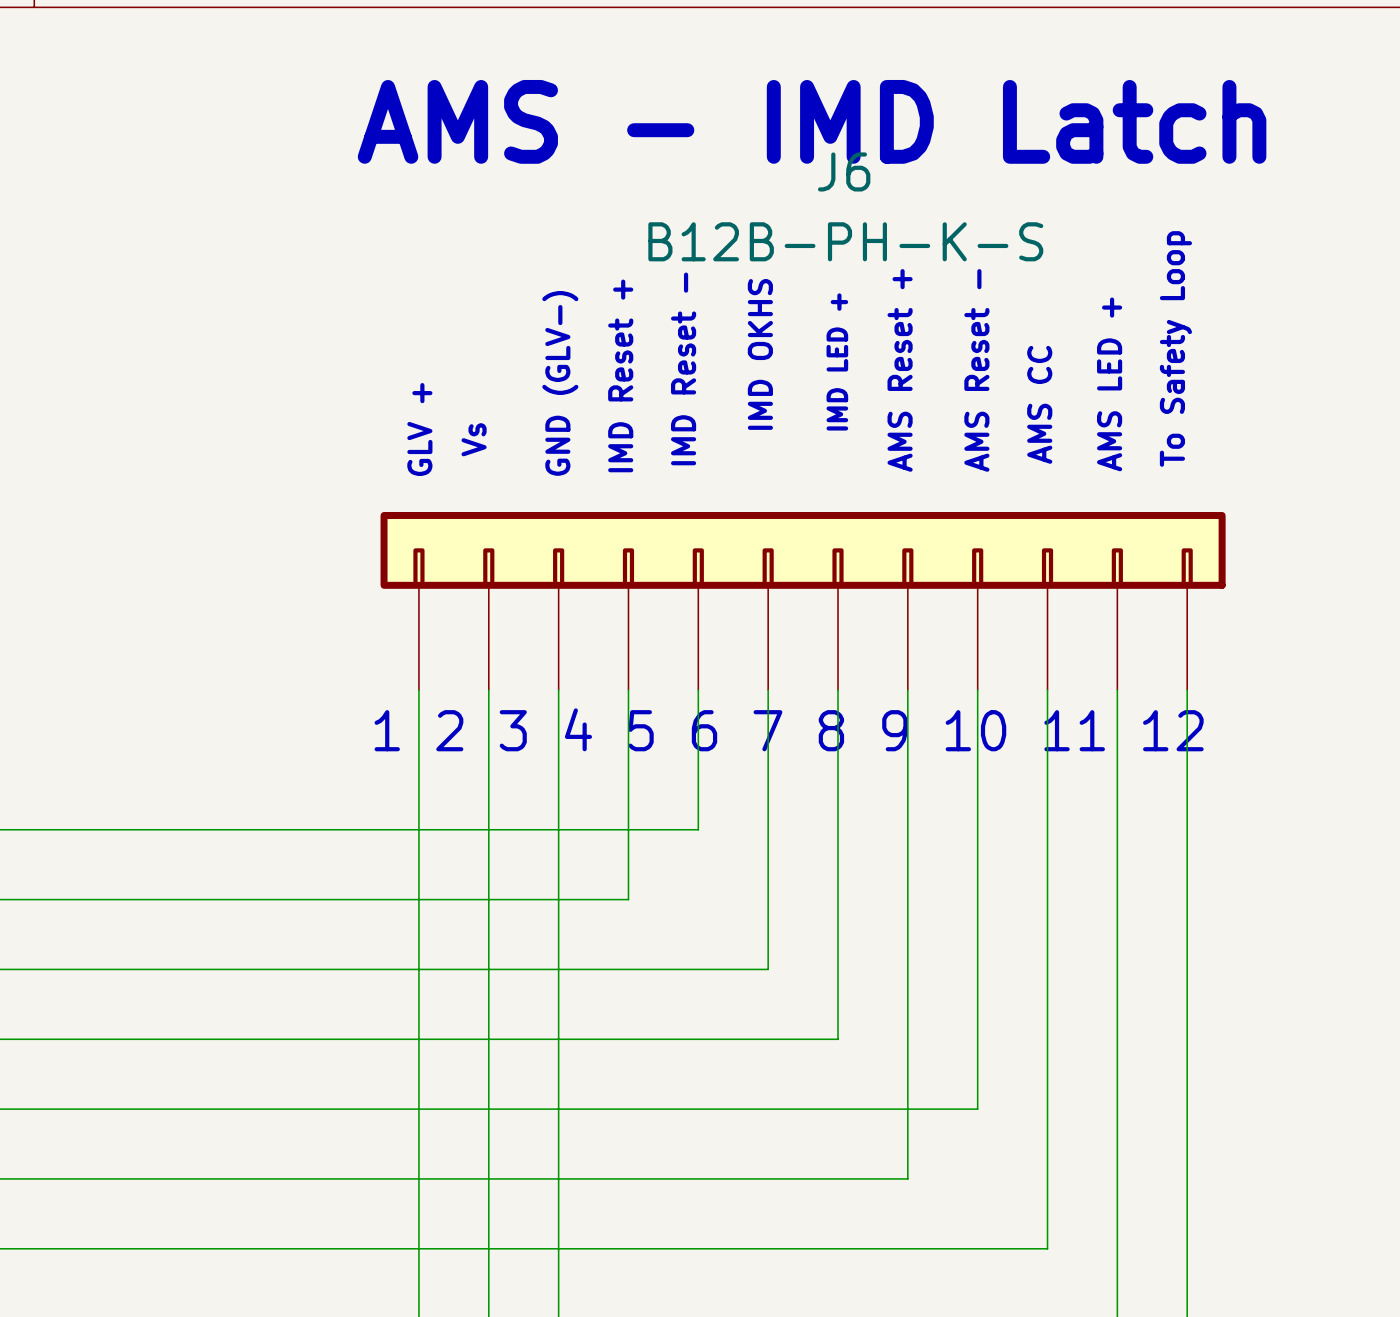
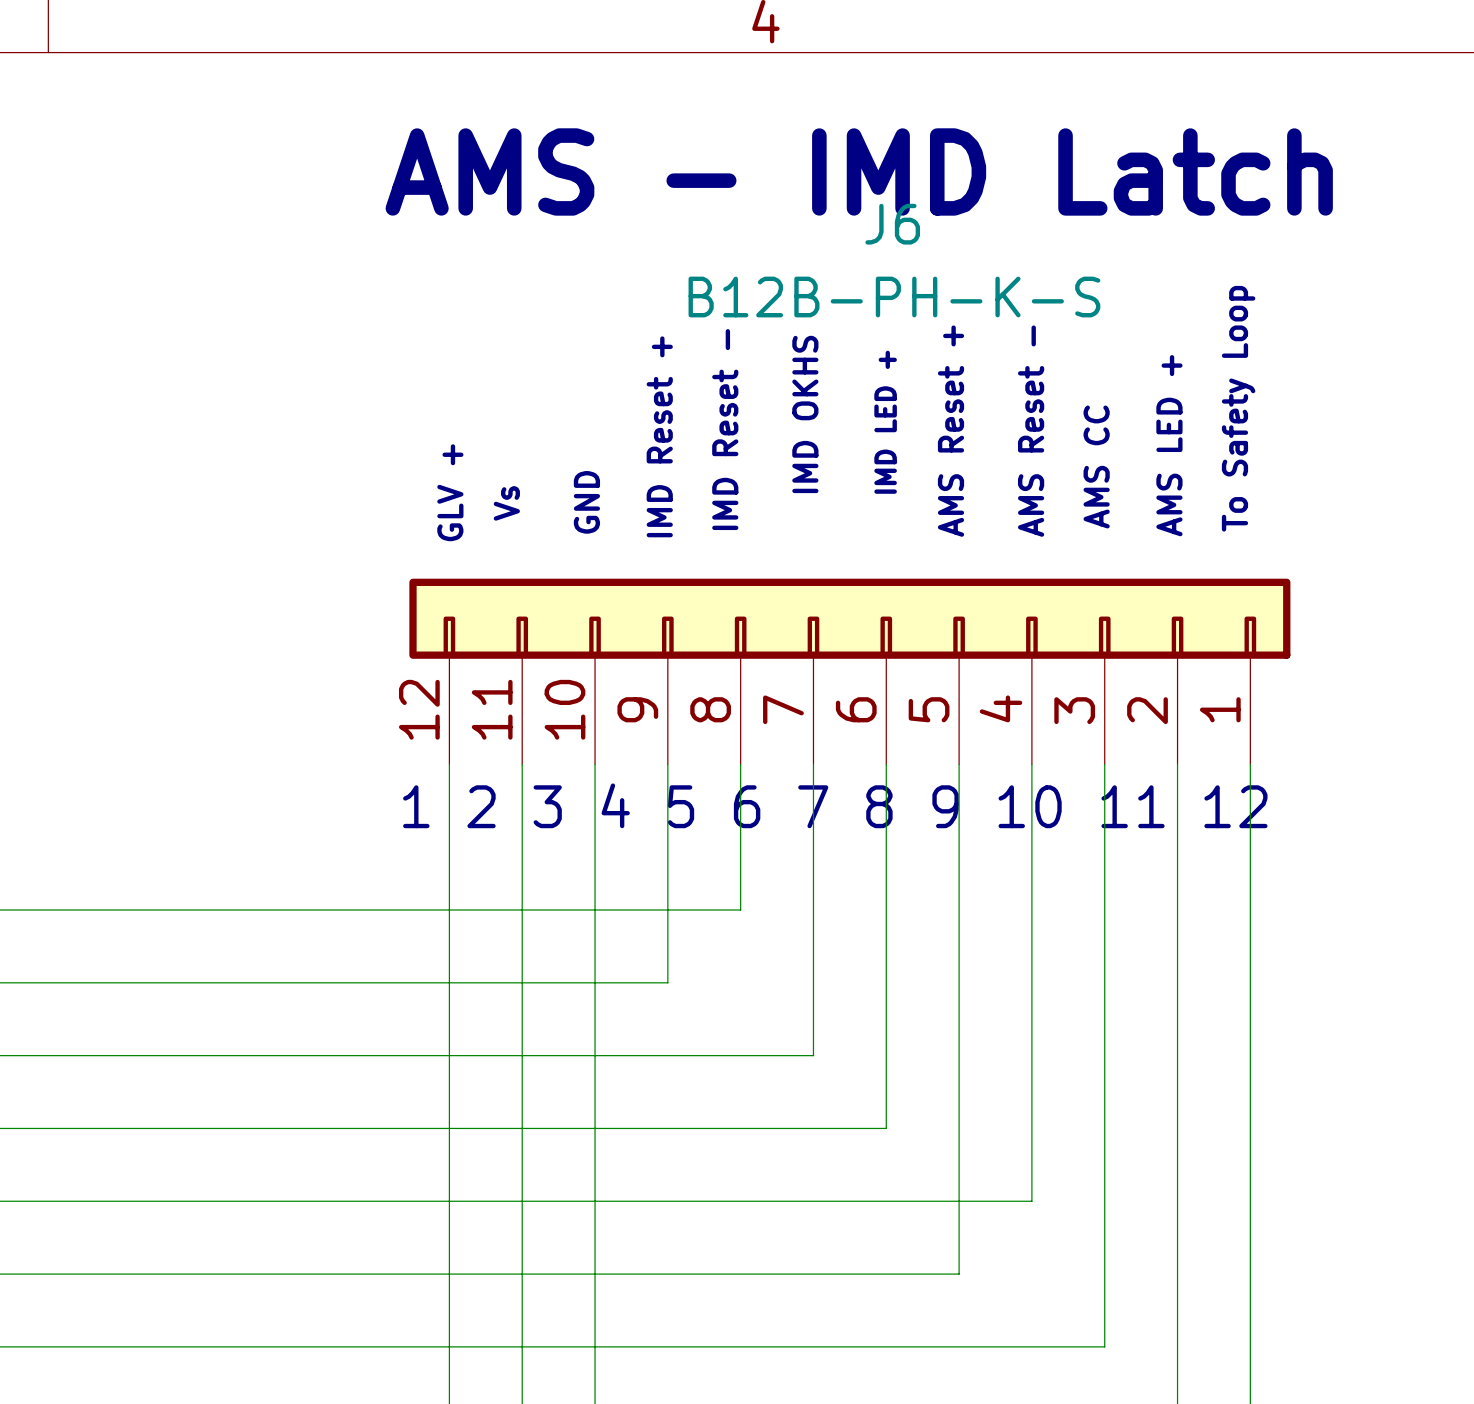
text: GND (GLV-) (560, 383) -> none
text: none -> GND (586, 502)
J6 symbol: [380, 511, 1226, 691] -> [409, 578, 1291, 765]

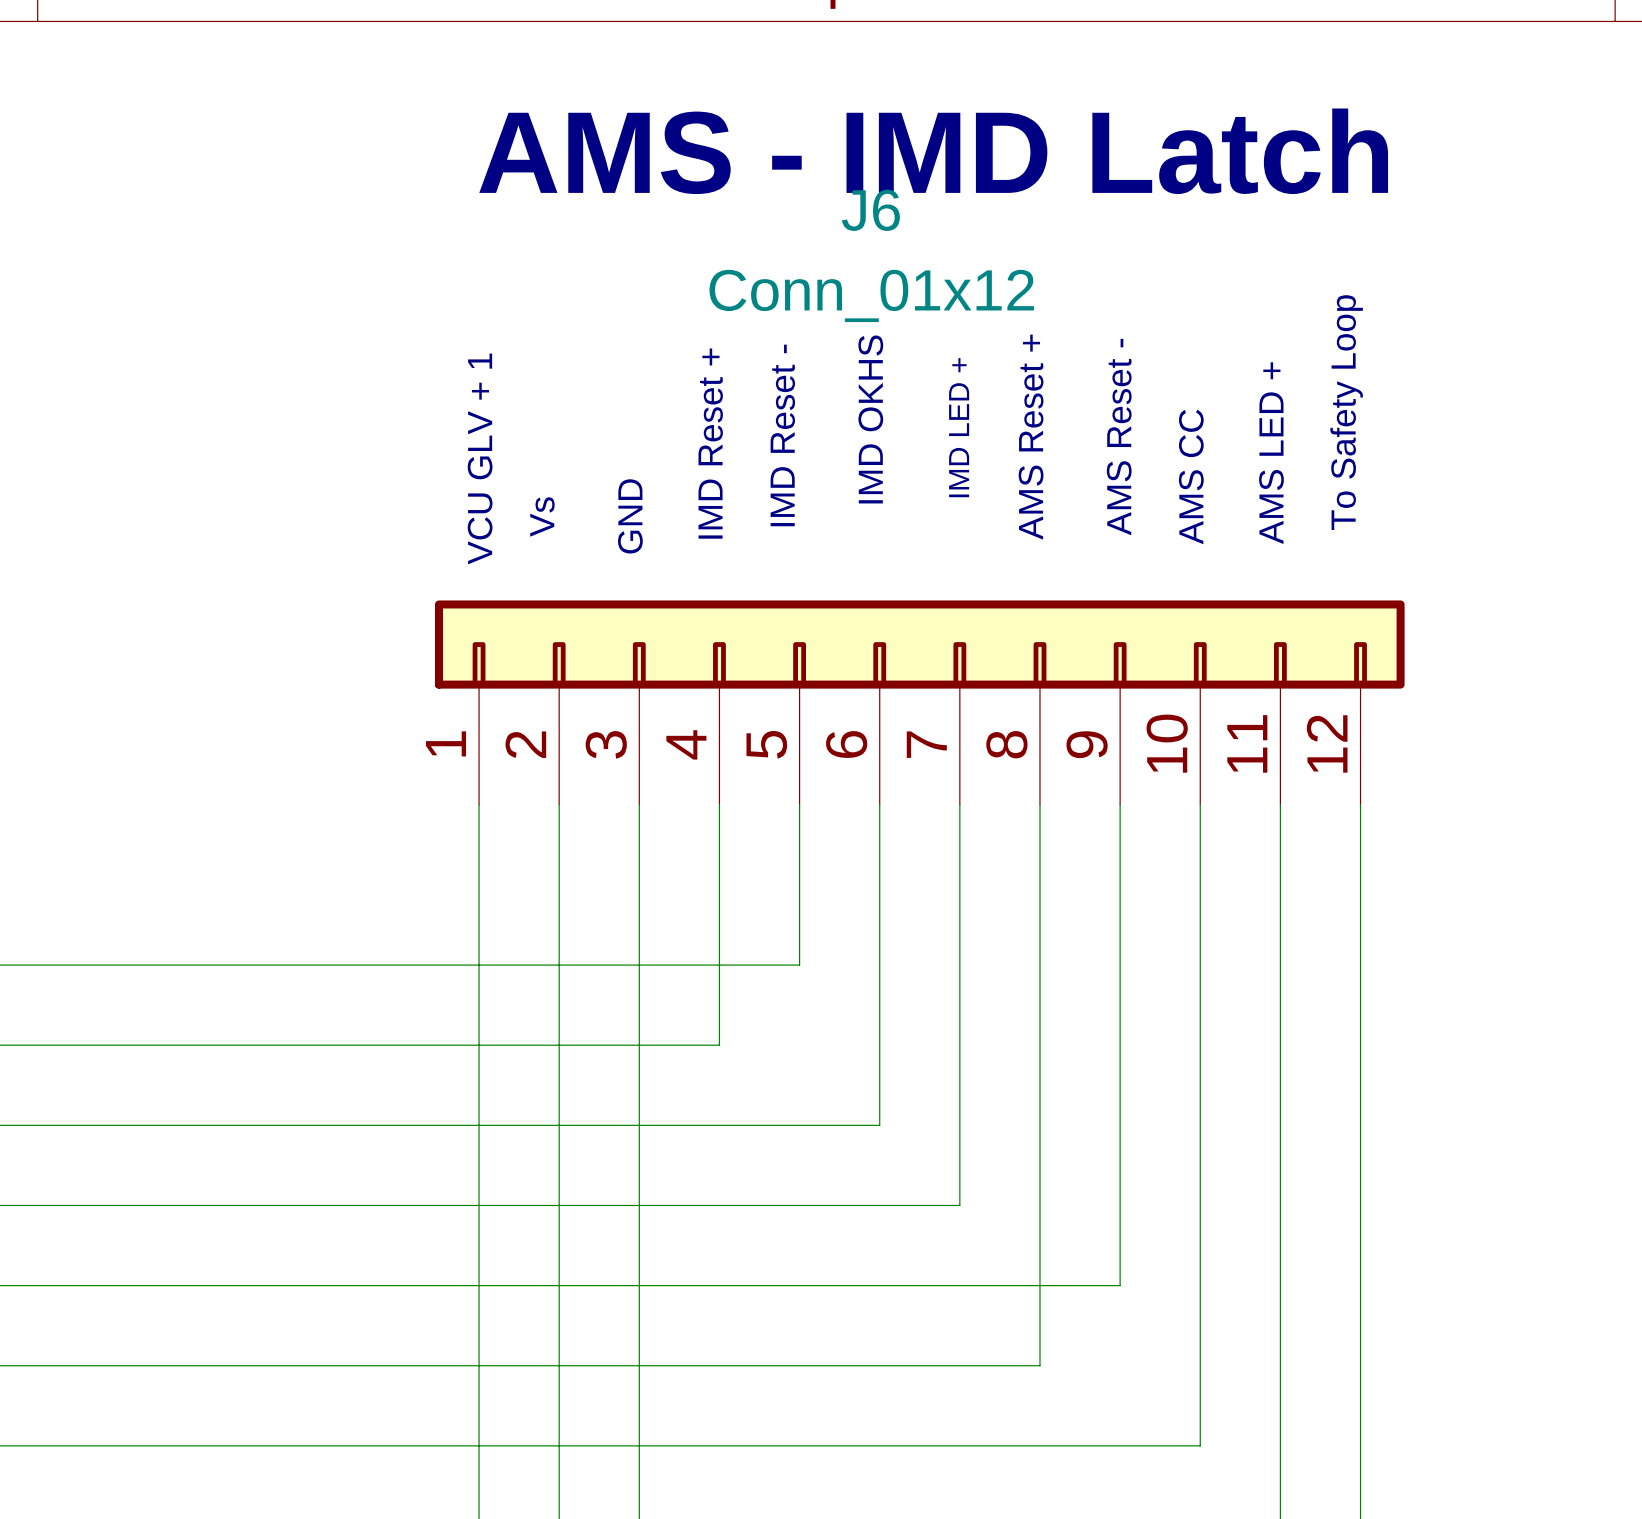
J6 value: B12B-PH-K-S (894, 297) -> Conn_01x12 (871, 295)
text: GLV + (450, 492) -> VCU GLV + 1 (480, 458)
J6 flip: as is (849, 618) -> left-right (919, 644)
text: 1 2 3 4 5 6 7 8 9 10 11 12 (835, 805) -> none

